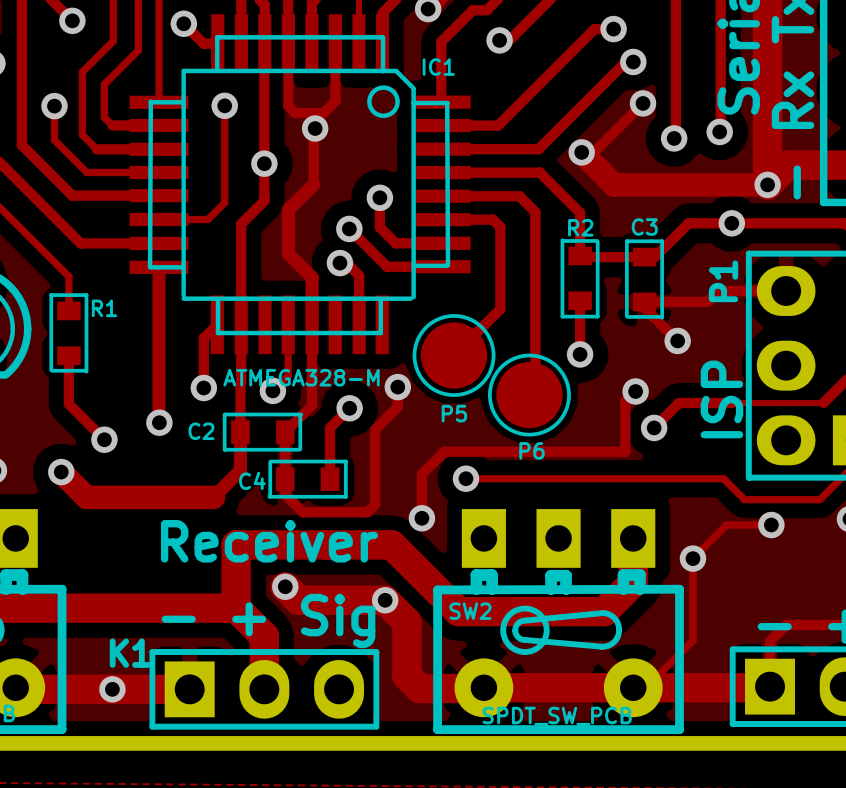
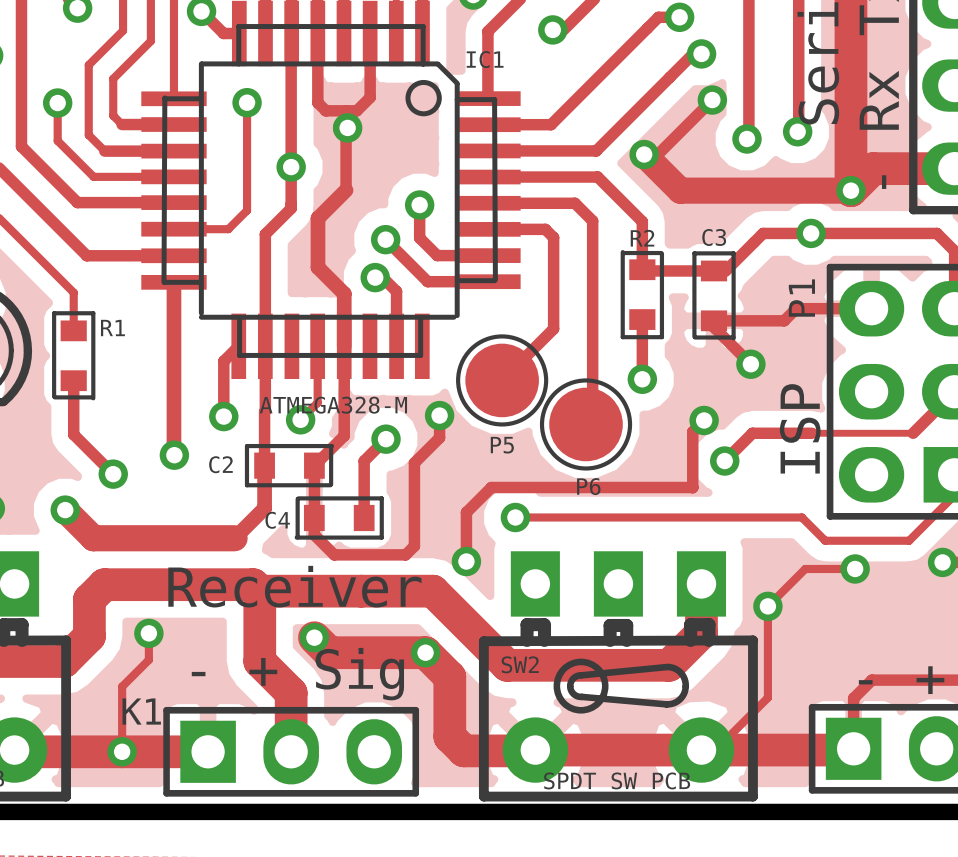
track: none -> (148, 633) (148, 659) (122, 686) (122, 751)
via: none -> (148, 633)
track: (60, 608) (236, 608) -> (64, 661) (89, 636) (89, 599) (104, 584) (253, 584) (259, 591)

